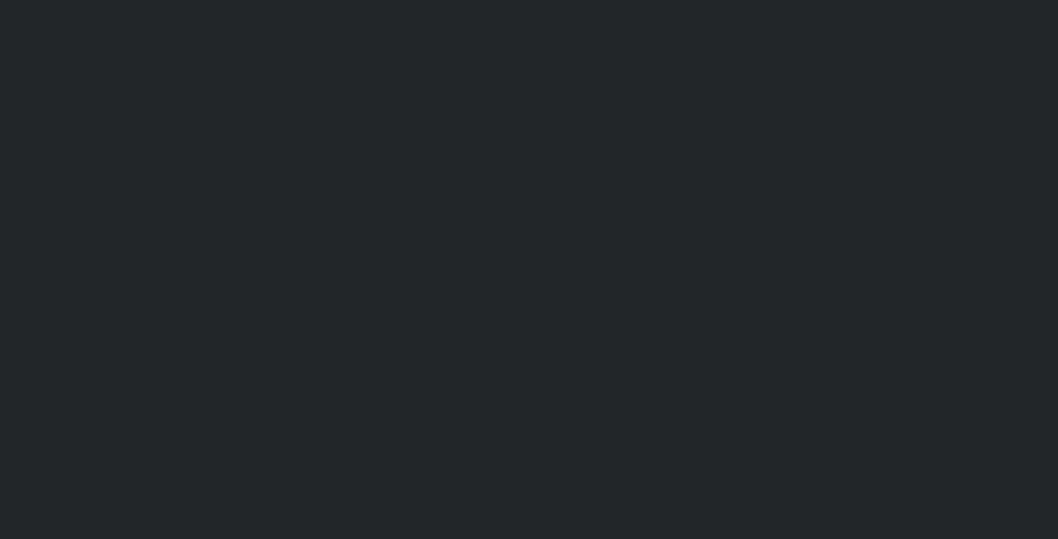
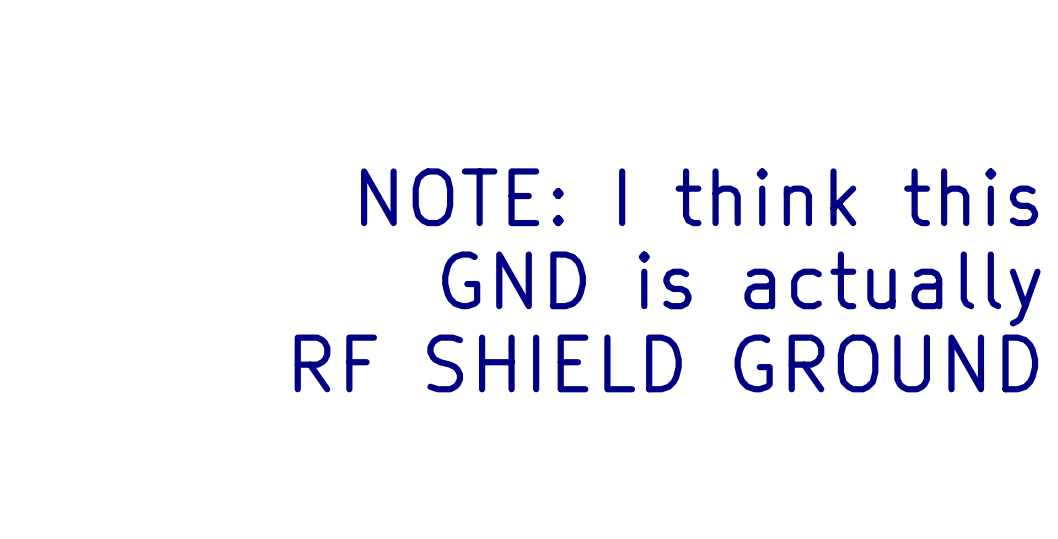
text: none -> NOTE: I think this (699, 197)
text: none -> GND is actually (741, 288)
text: none -> RF SHIELD GROUND (666, 363)

